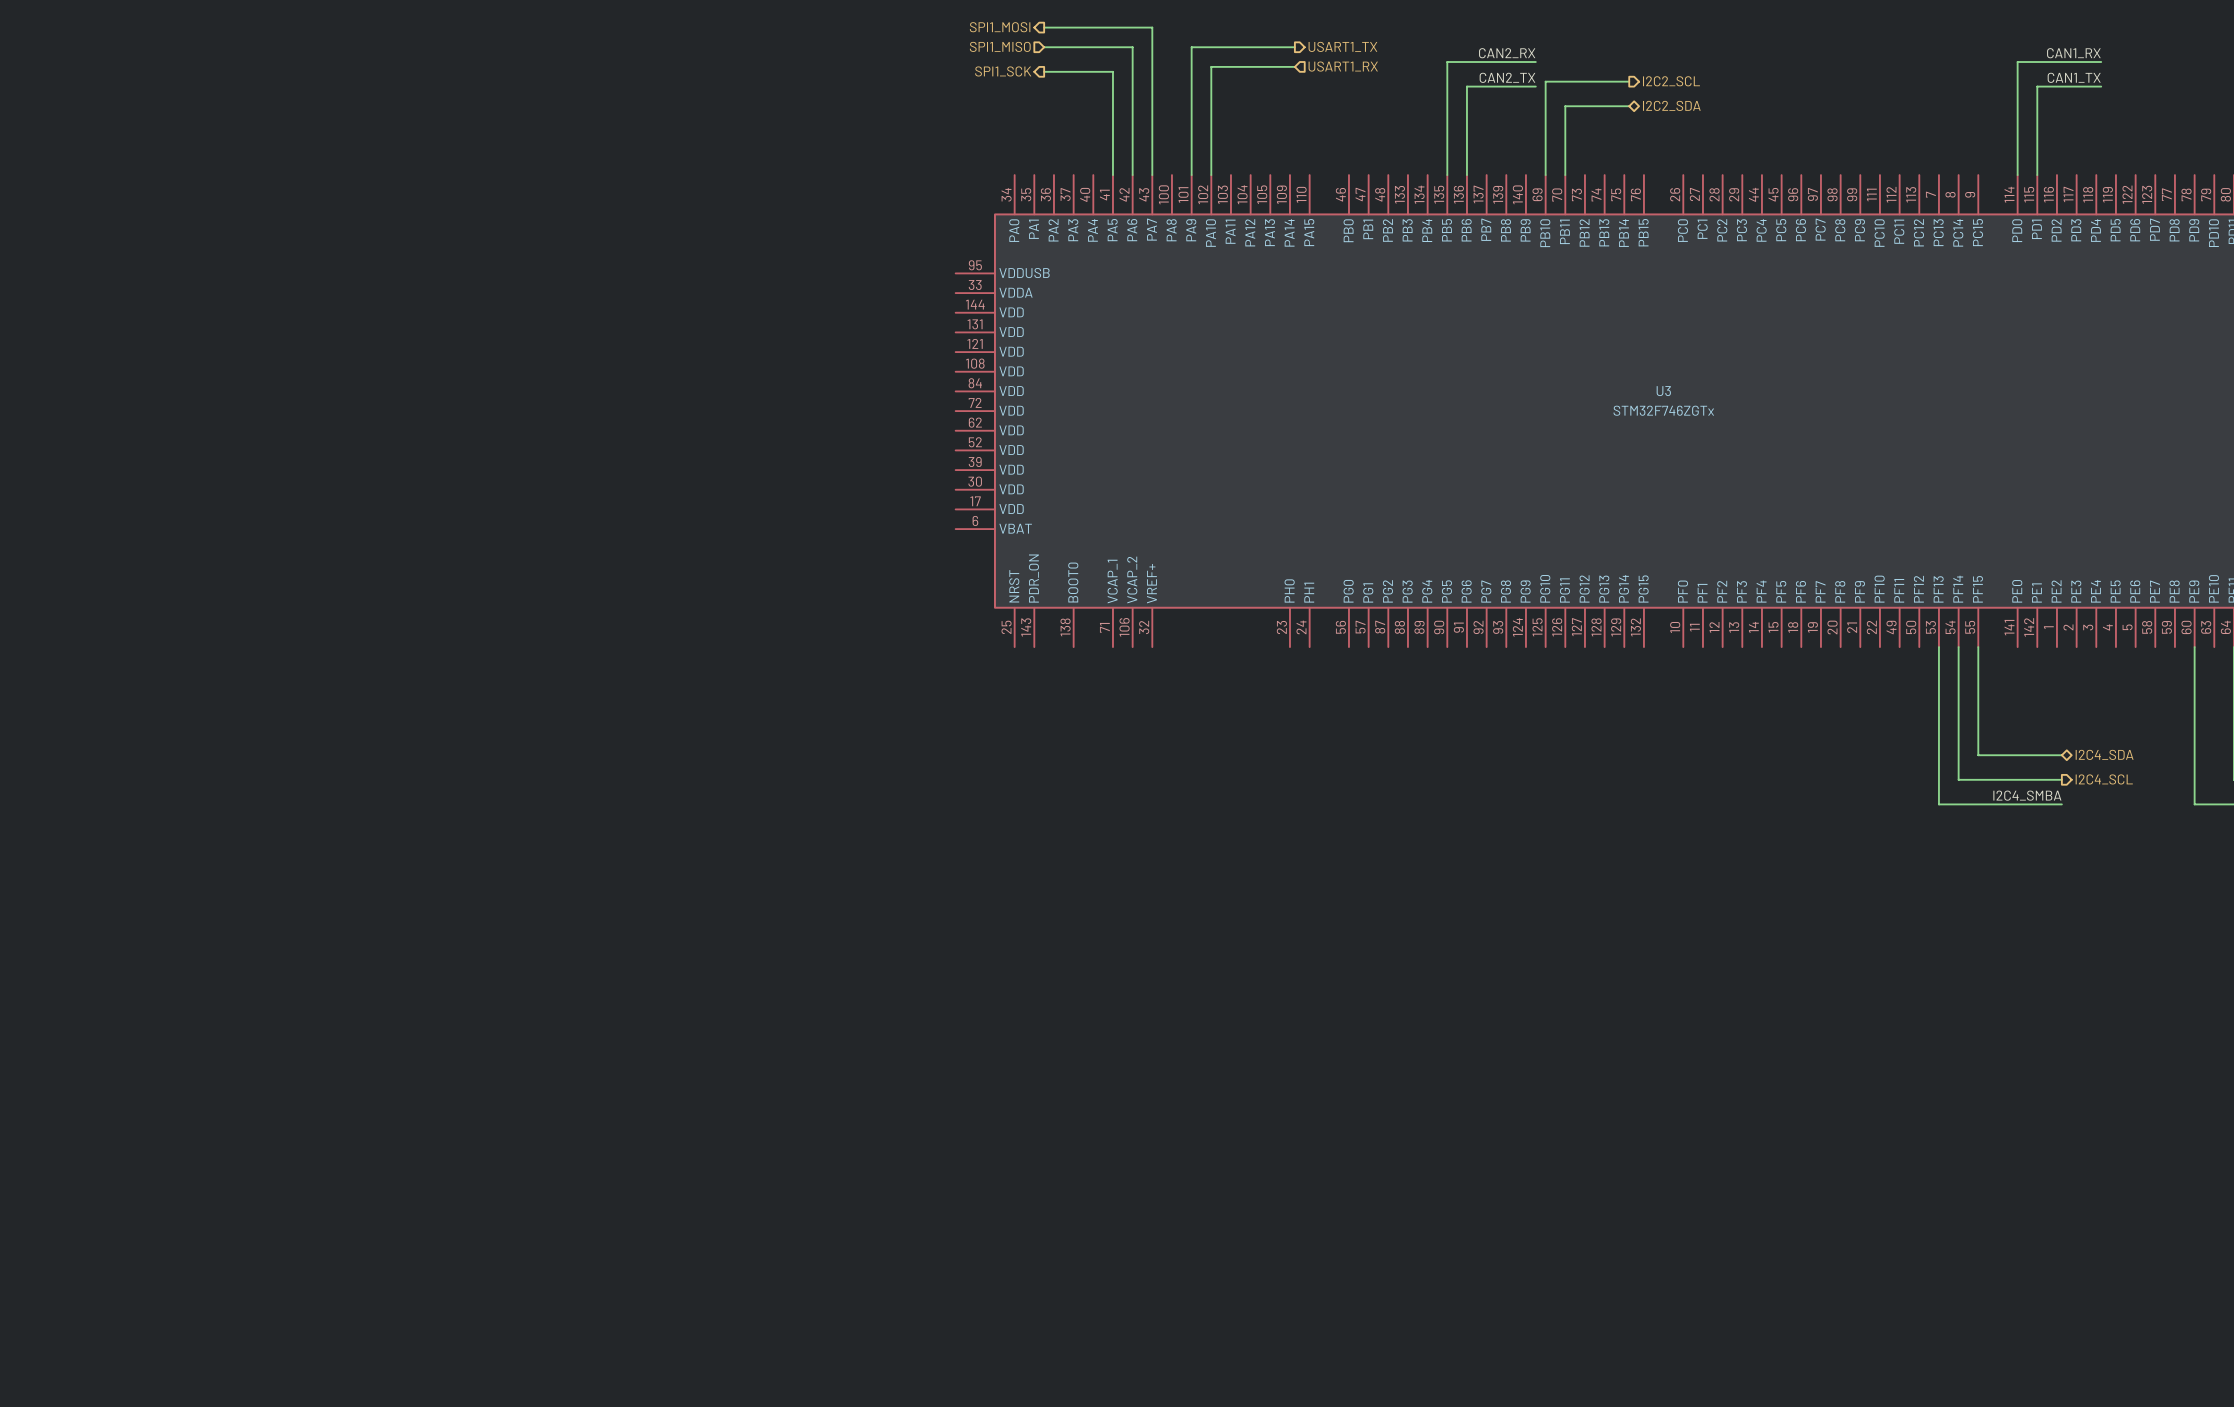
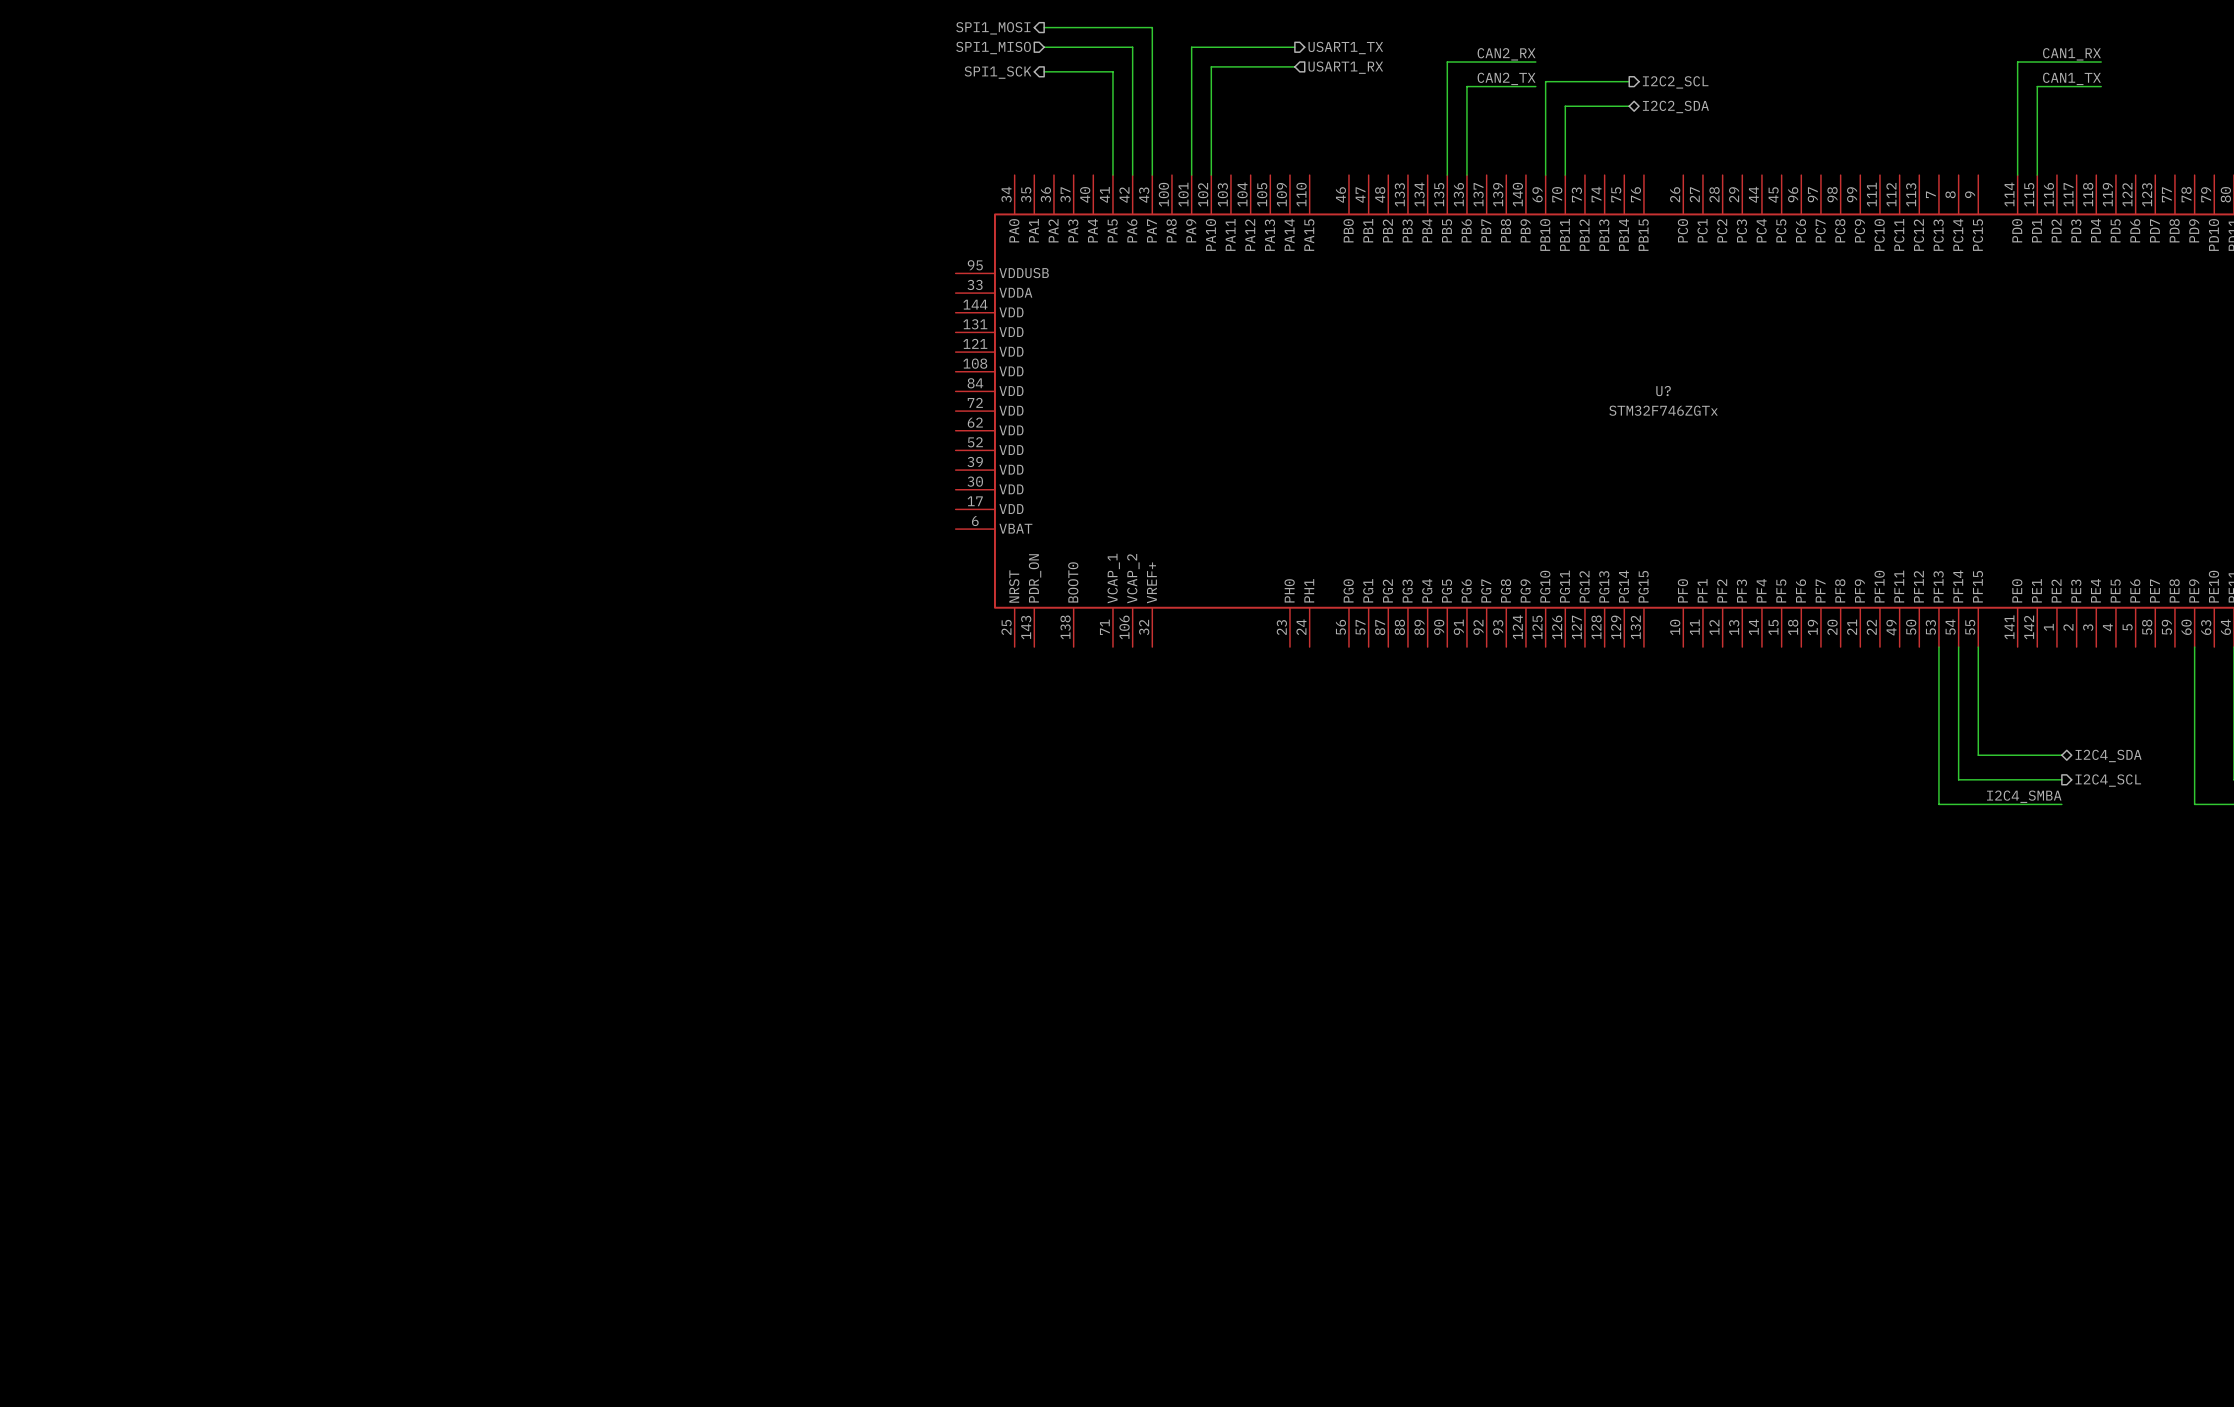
U3 name: U3 (1663, 391) -> U? (1663, 391)

